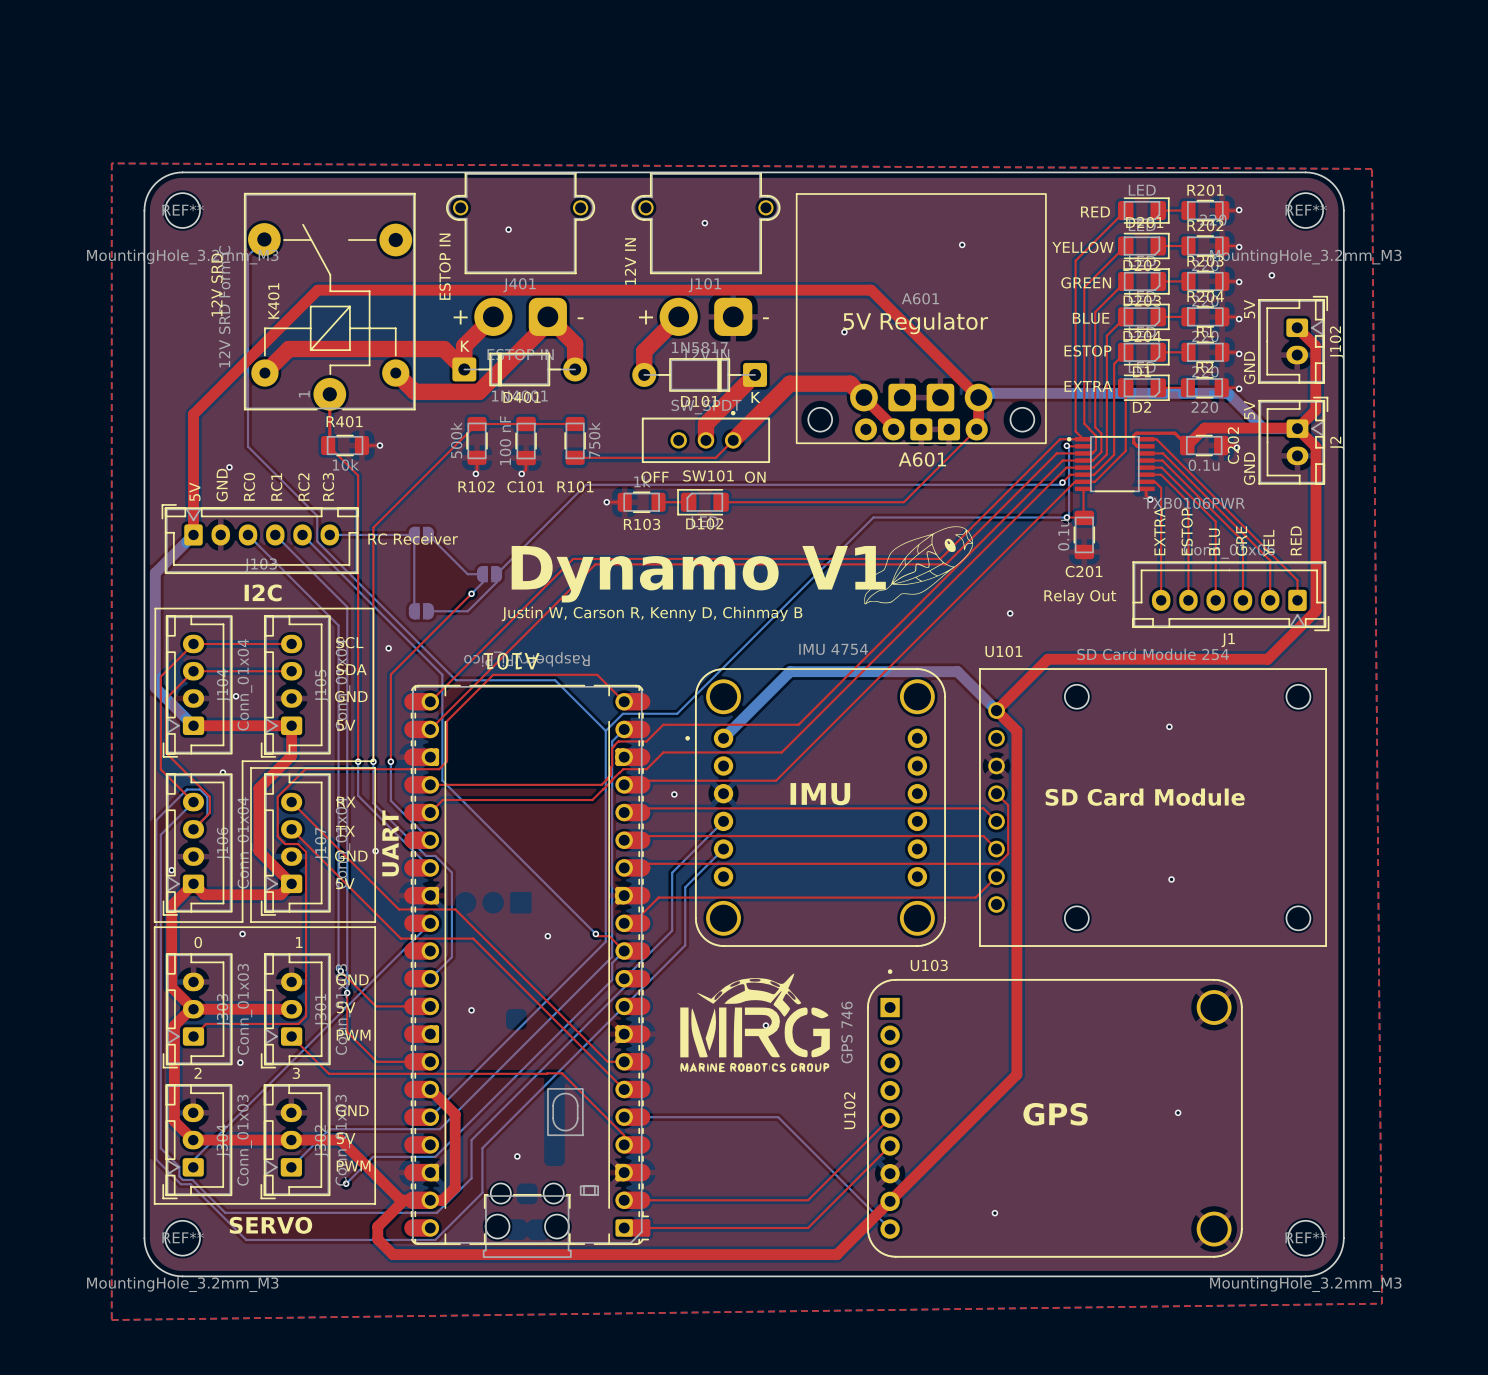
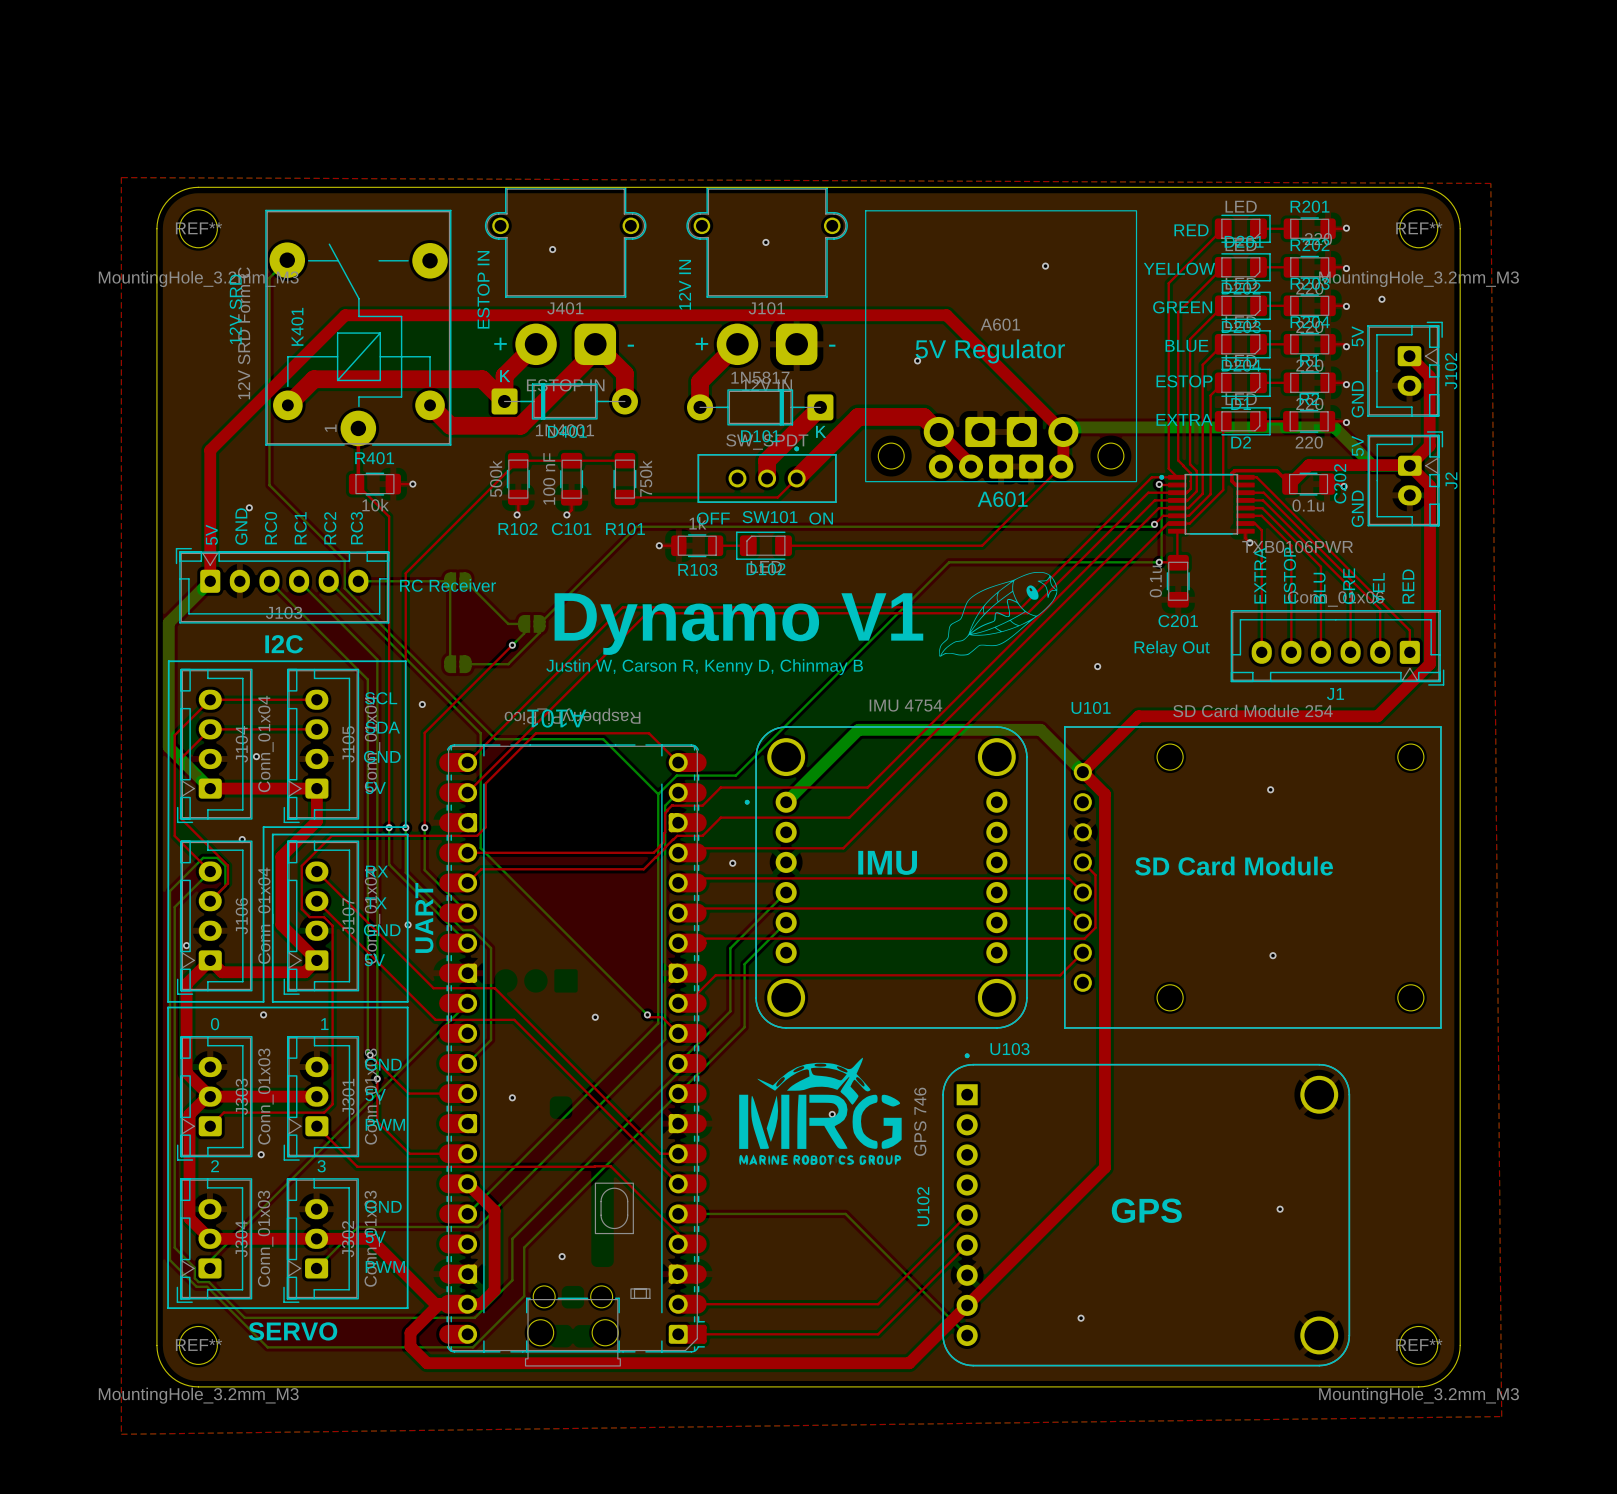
bottom track: (624, 951) (612, 963) (612, 980) (435, 1156) (372, 1156) (346, 1183) -> none
via: (346, 1183) -> none

